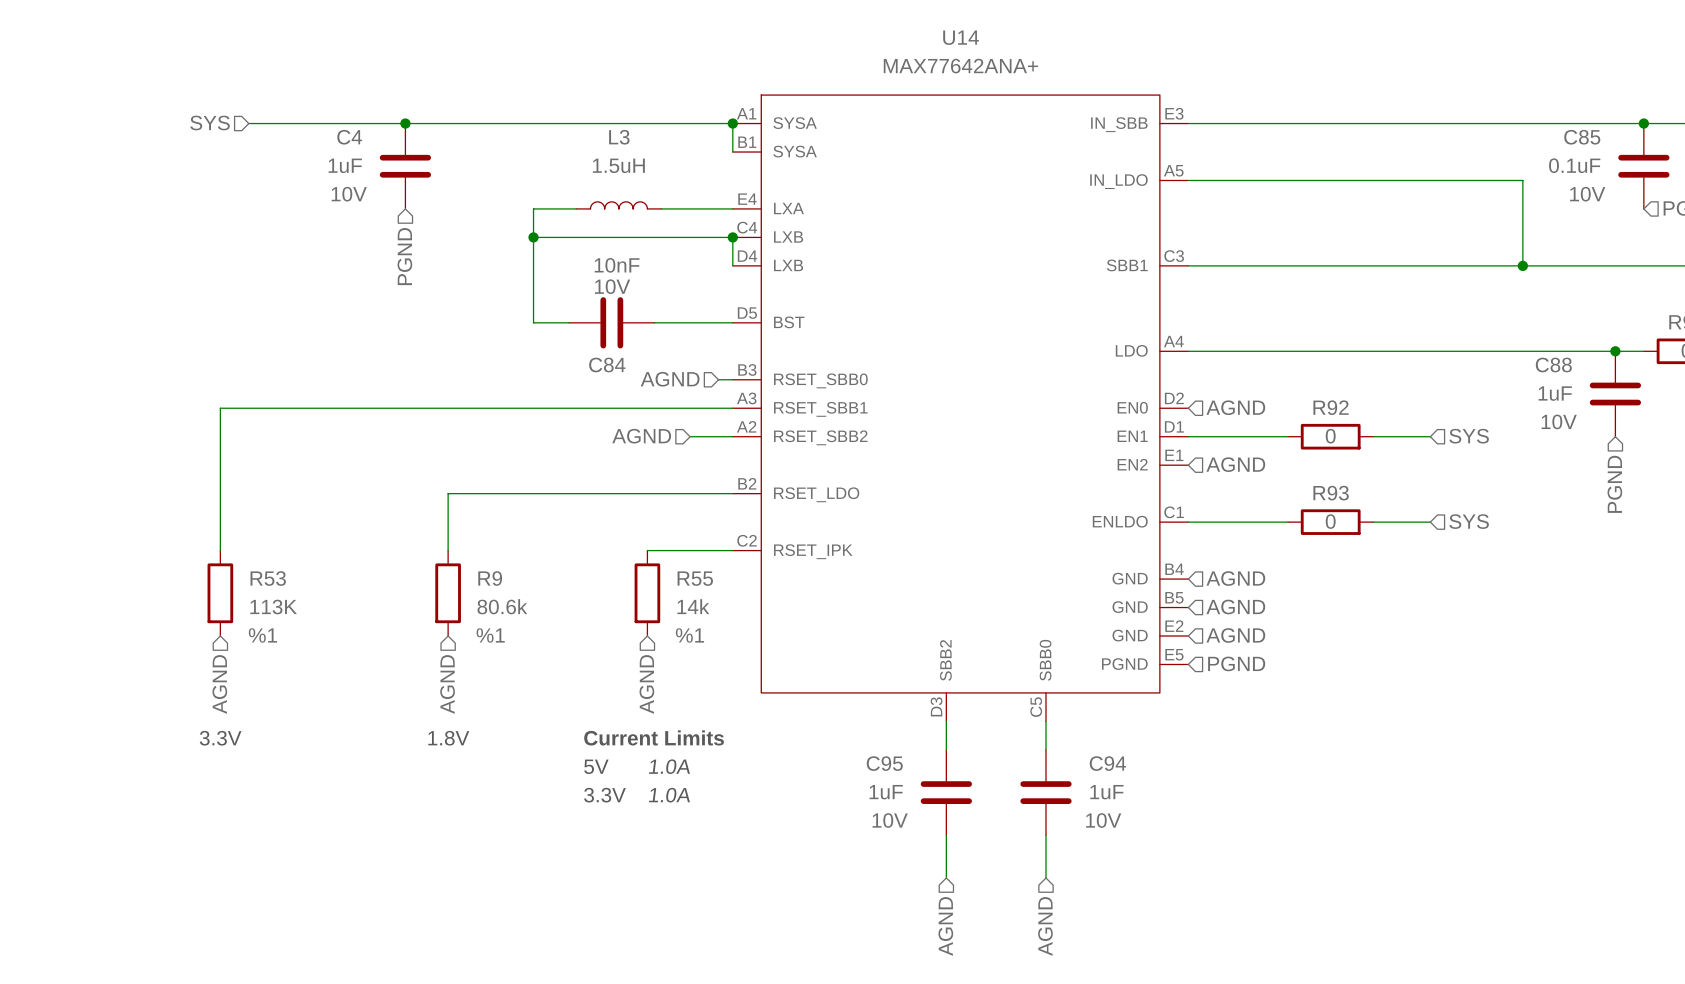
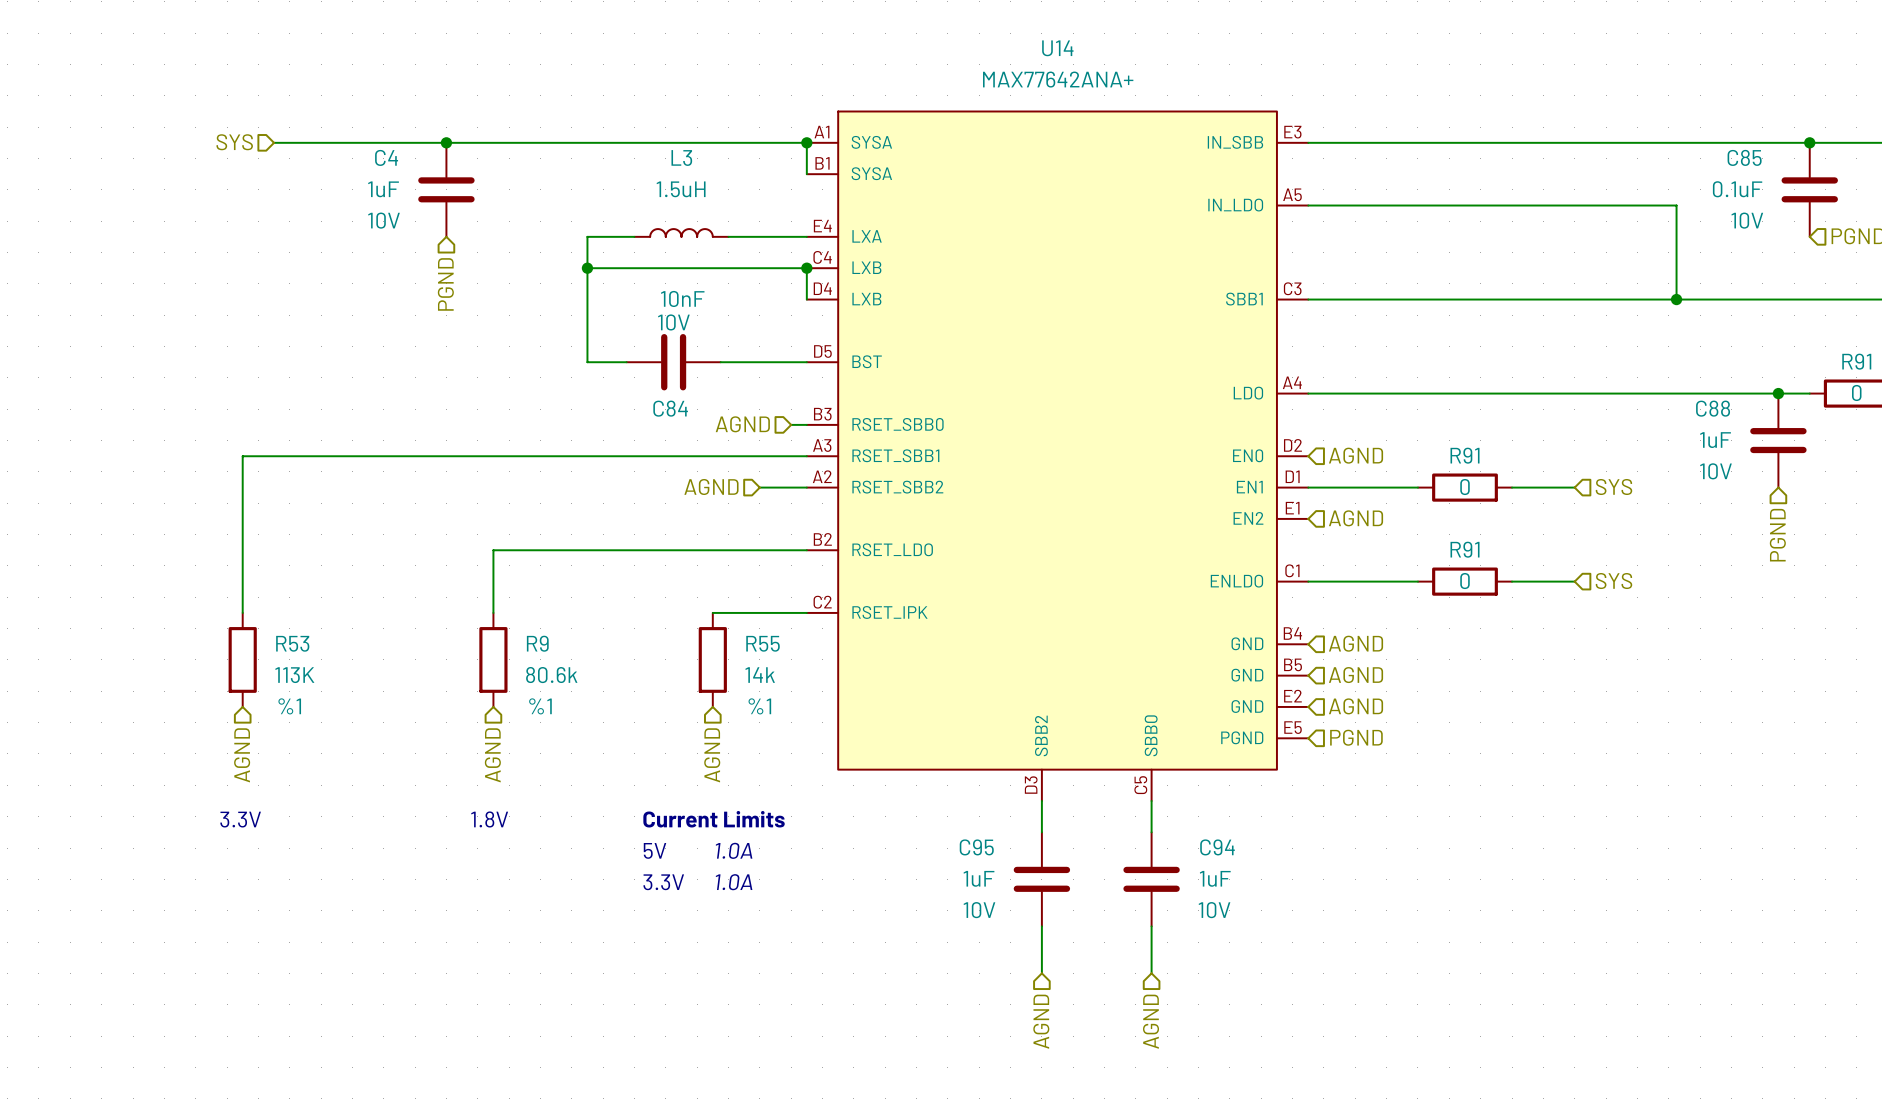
R92 name: R92 (1331, 407) -> R91 (1465, 455)
R93 name: R93 (1331, 493) -> R91 (1465, 549)

